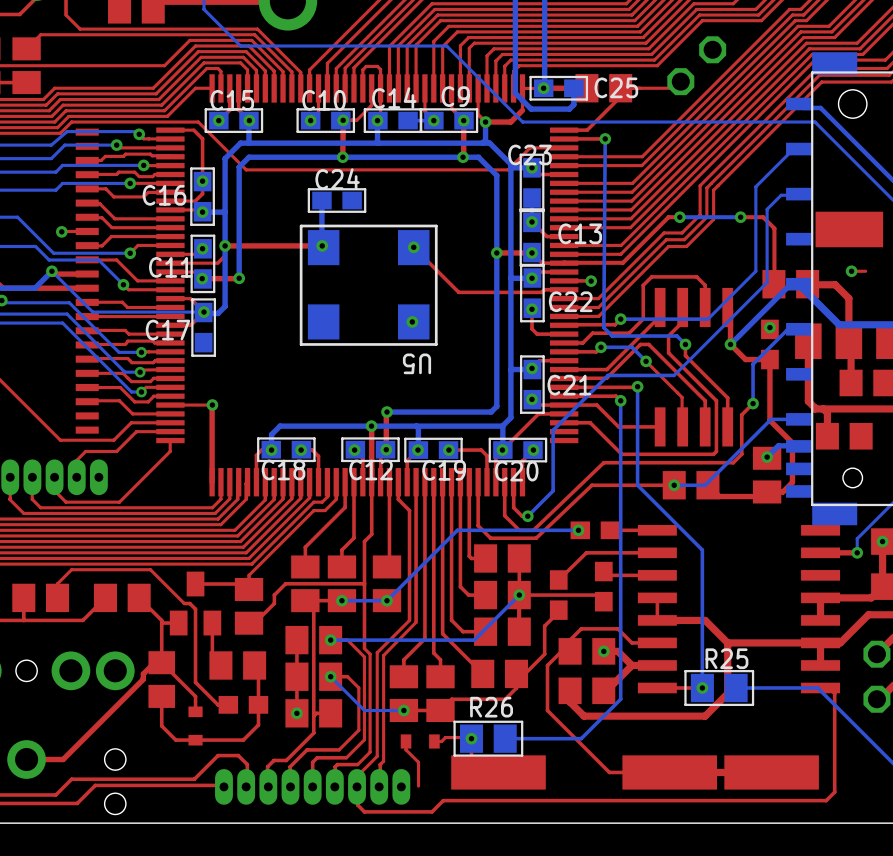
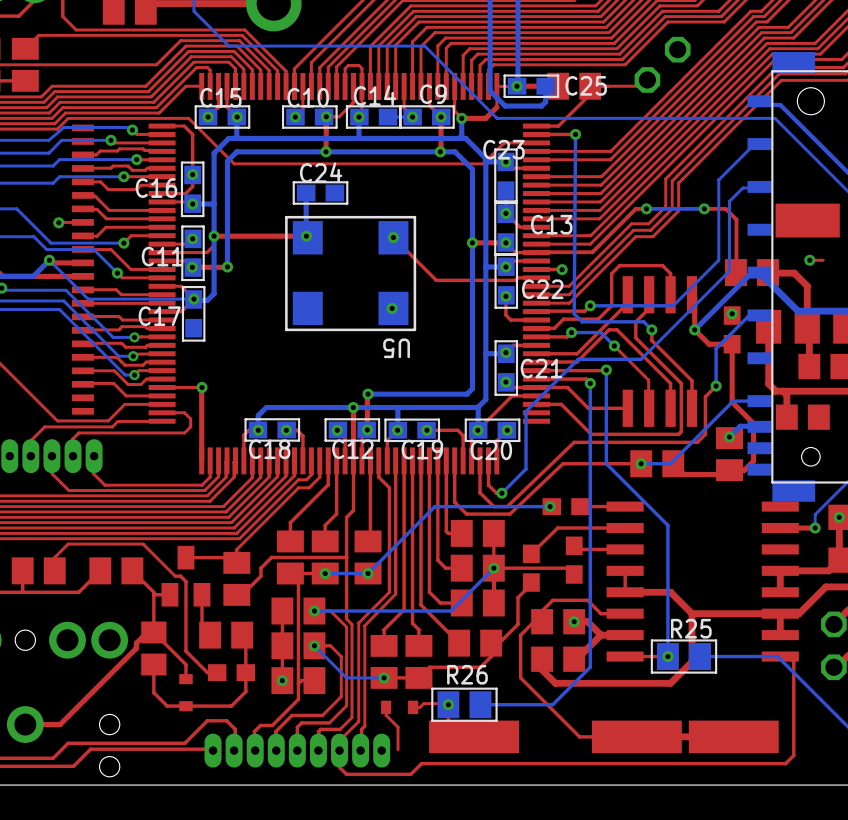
top track: (170, 431) (136, 431) (116, 451) (85, 451) (76, 460) (76, 477) -> (162, 412) (184, 412) (190, 418) (190, 426) (184, 432) (78, 432) (72, 438) (72, 456)
top track: (170, 440) (170, 451) (119, 502) (66, 502) (54, 490) (54, 477) -> (161, 421) (117, 421) (112, 426) (44, 426) (31, 440) (30, 456)
top track: (10, 477) (9, 499) (23, 513) (72, 513) -> (52, 456) (52, 473) (68, 490)
top track: (32, 477) (32, 499) (40, 507) (110, 507) -> (94, 456) (93, 473) (104, 485)

